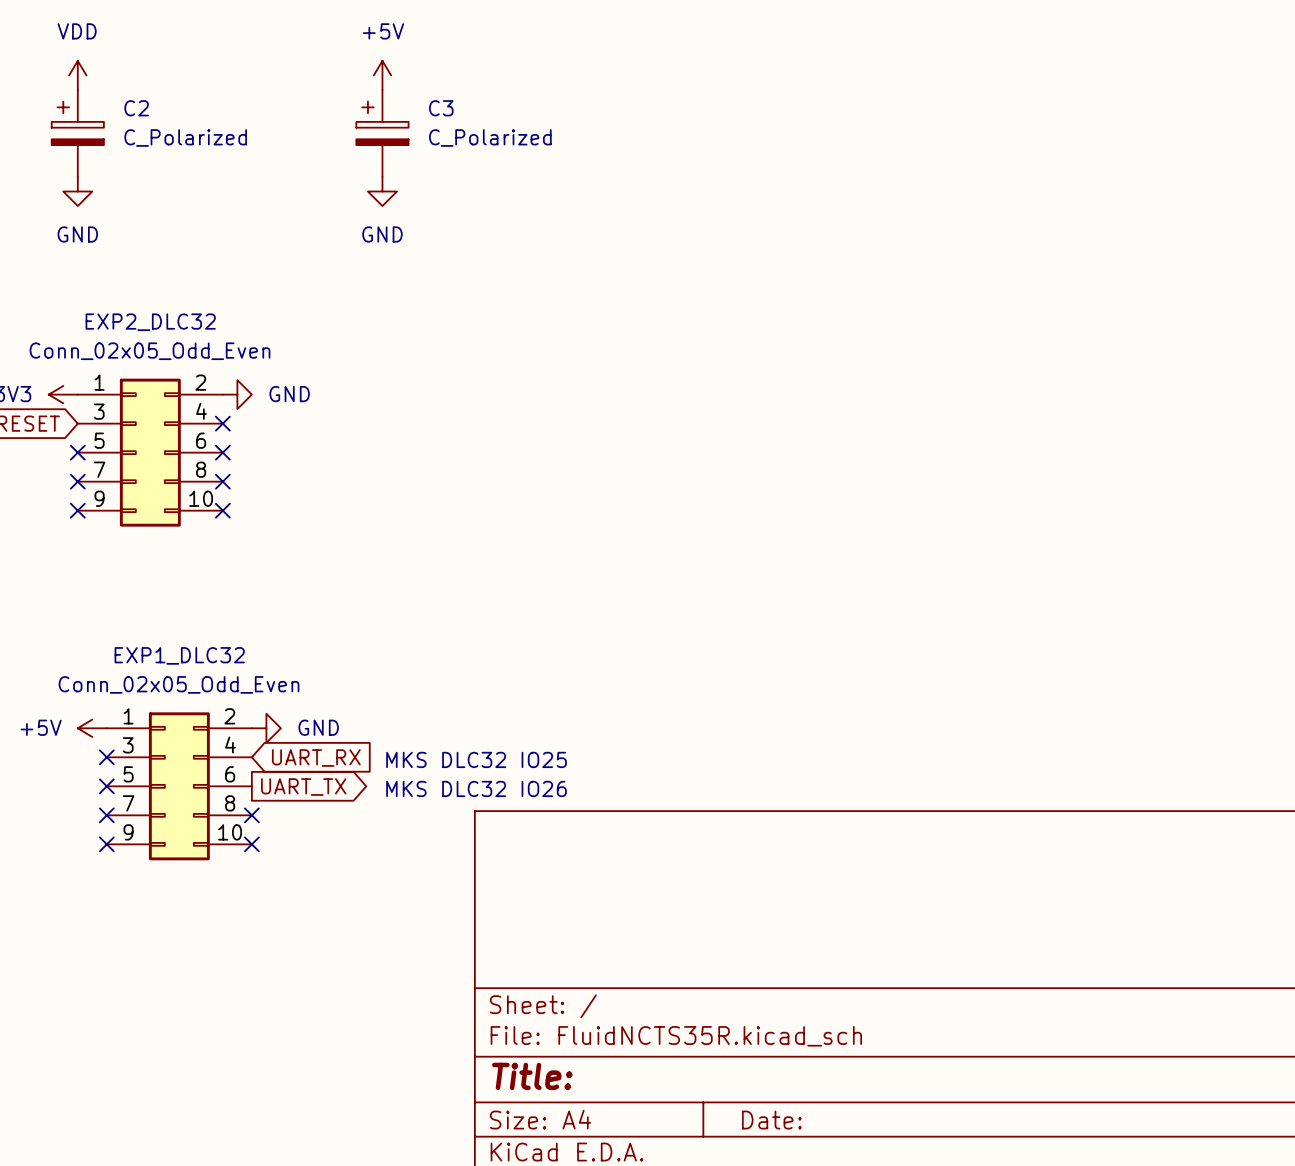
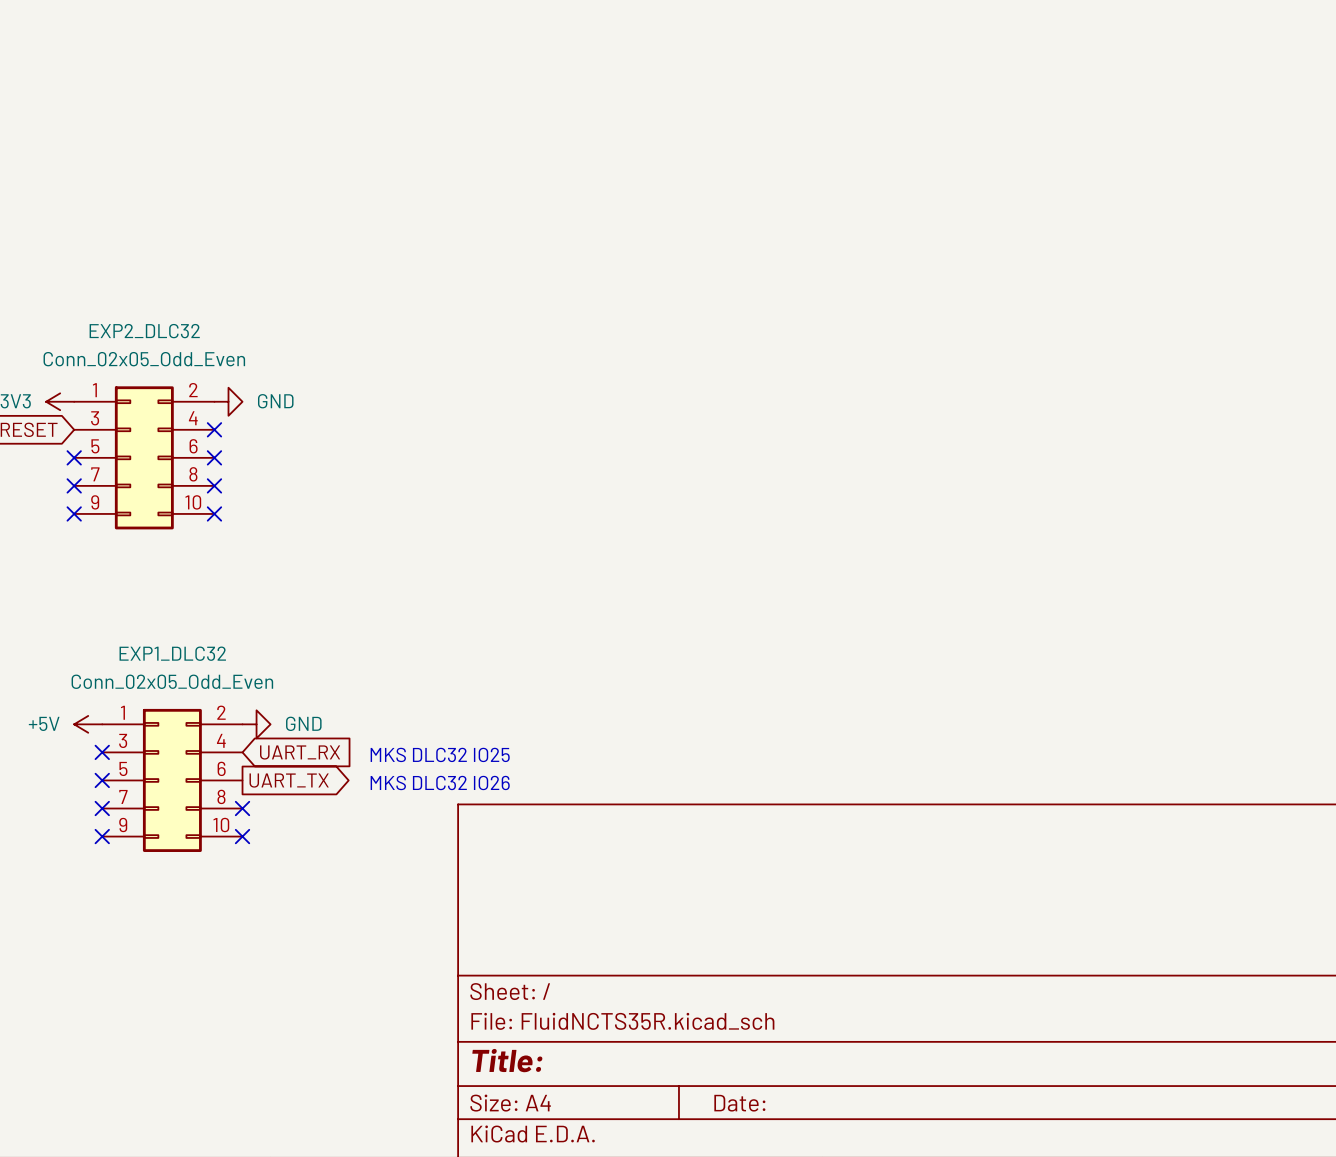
power symbol: VDD (77, 75) -> none
power symbol: +5V (382, 75) -> none
C2: C_Polarized (77, 133) -> none
C3: C_Polarized (382, 133) -> none
power symbol: GND (77, 191) -> none
power symbol: GND (382, 191) -> none

